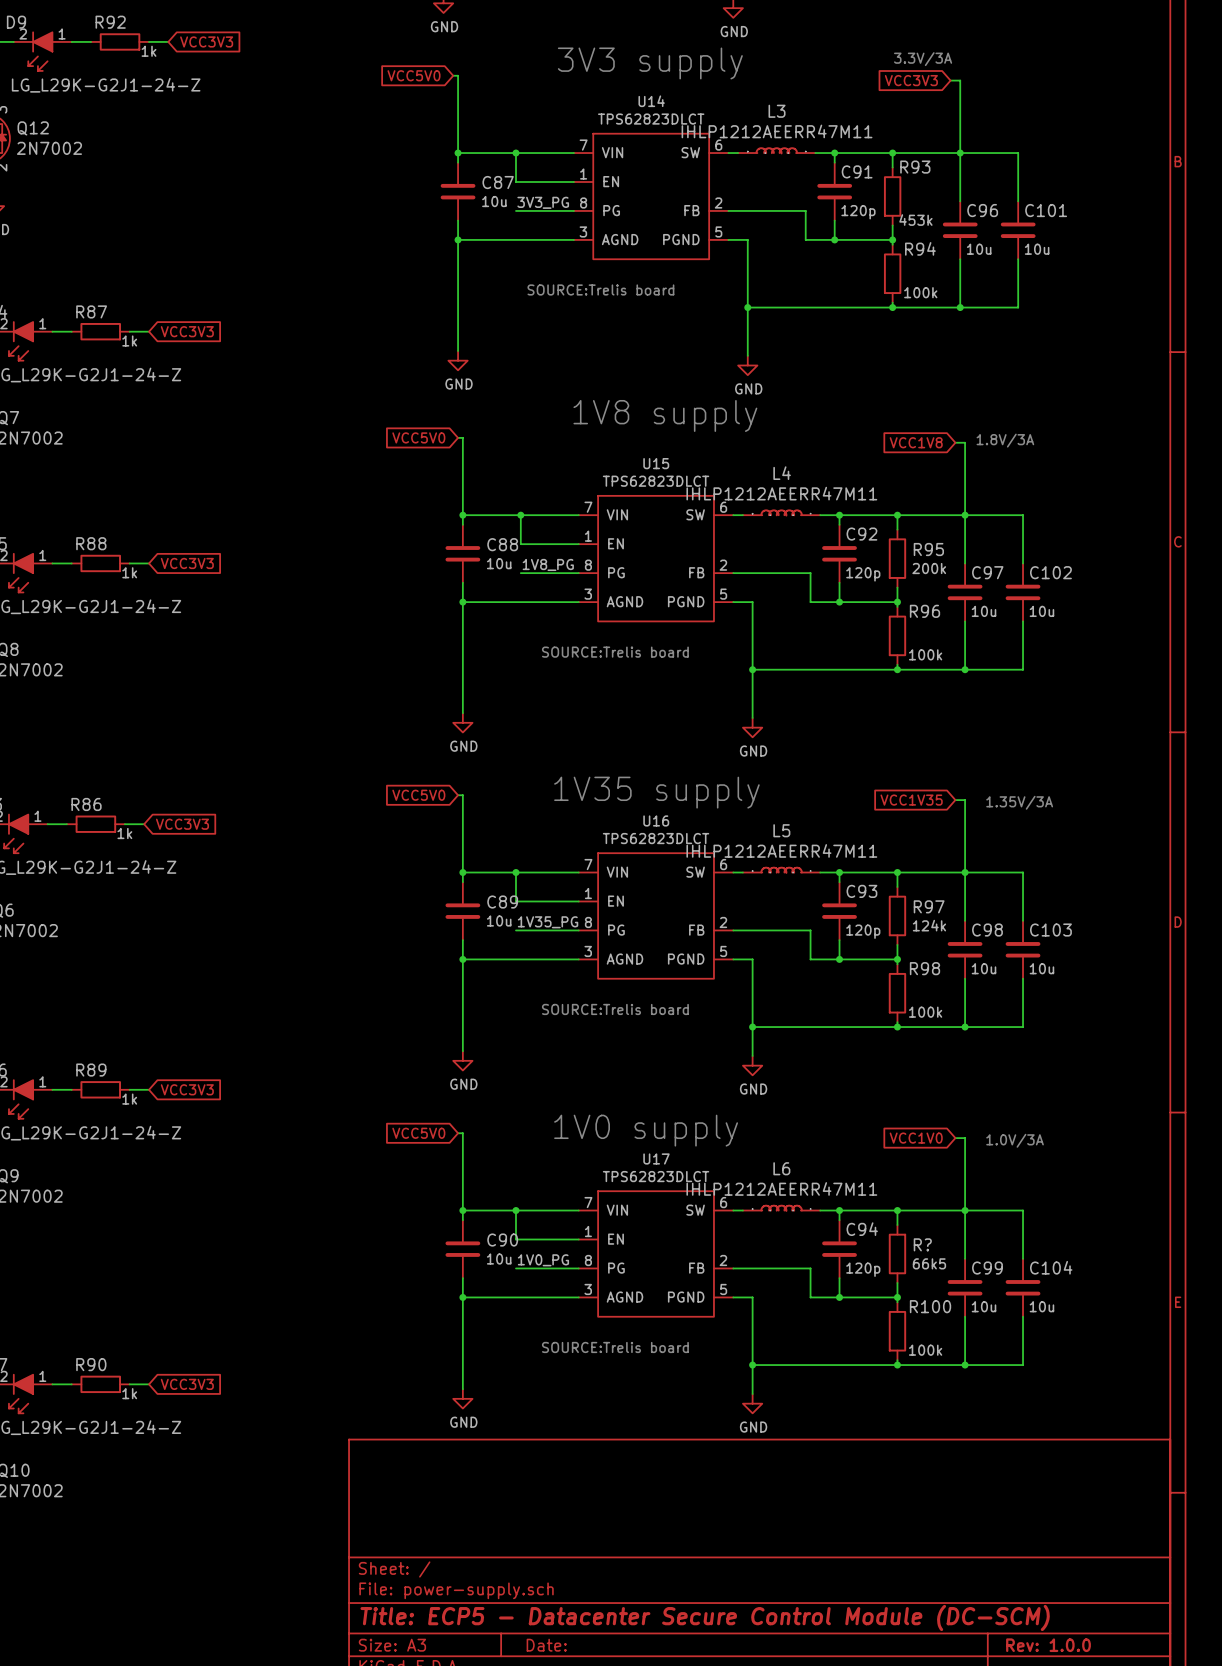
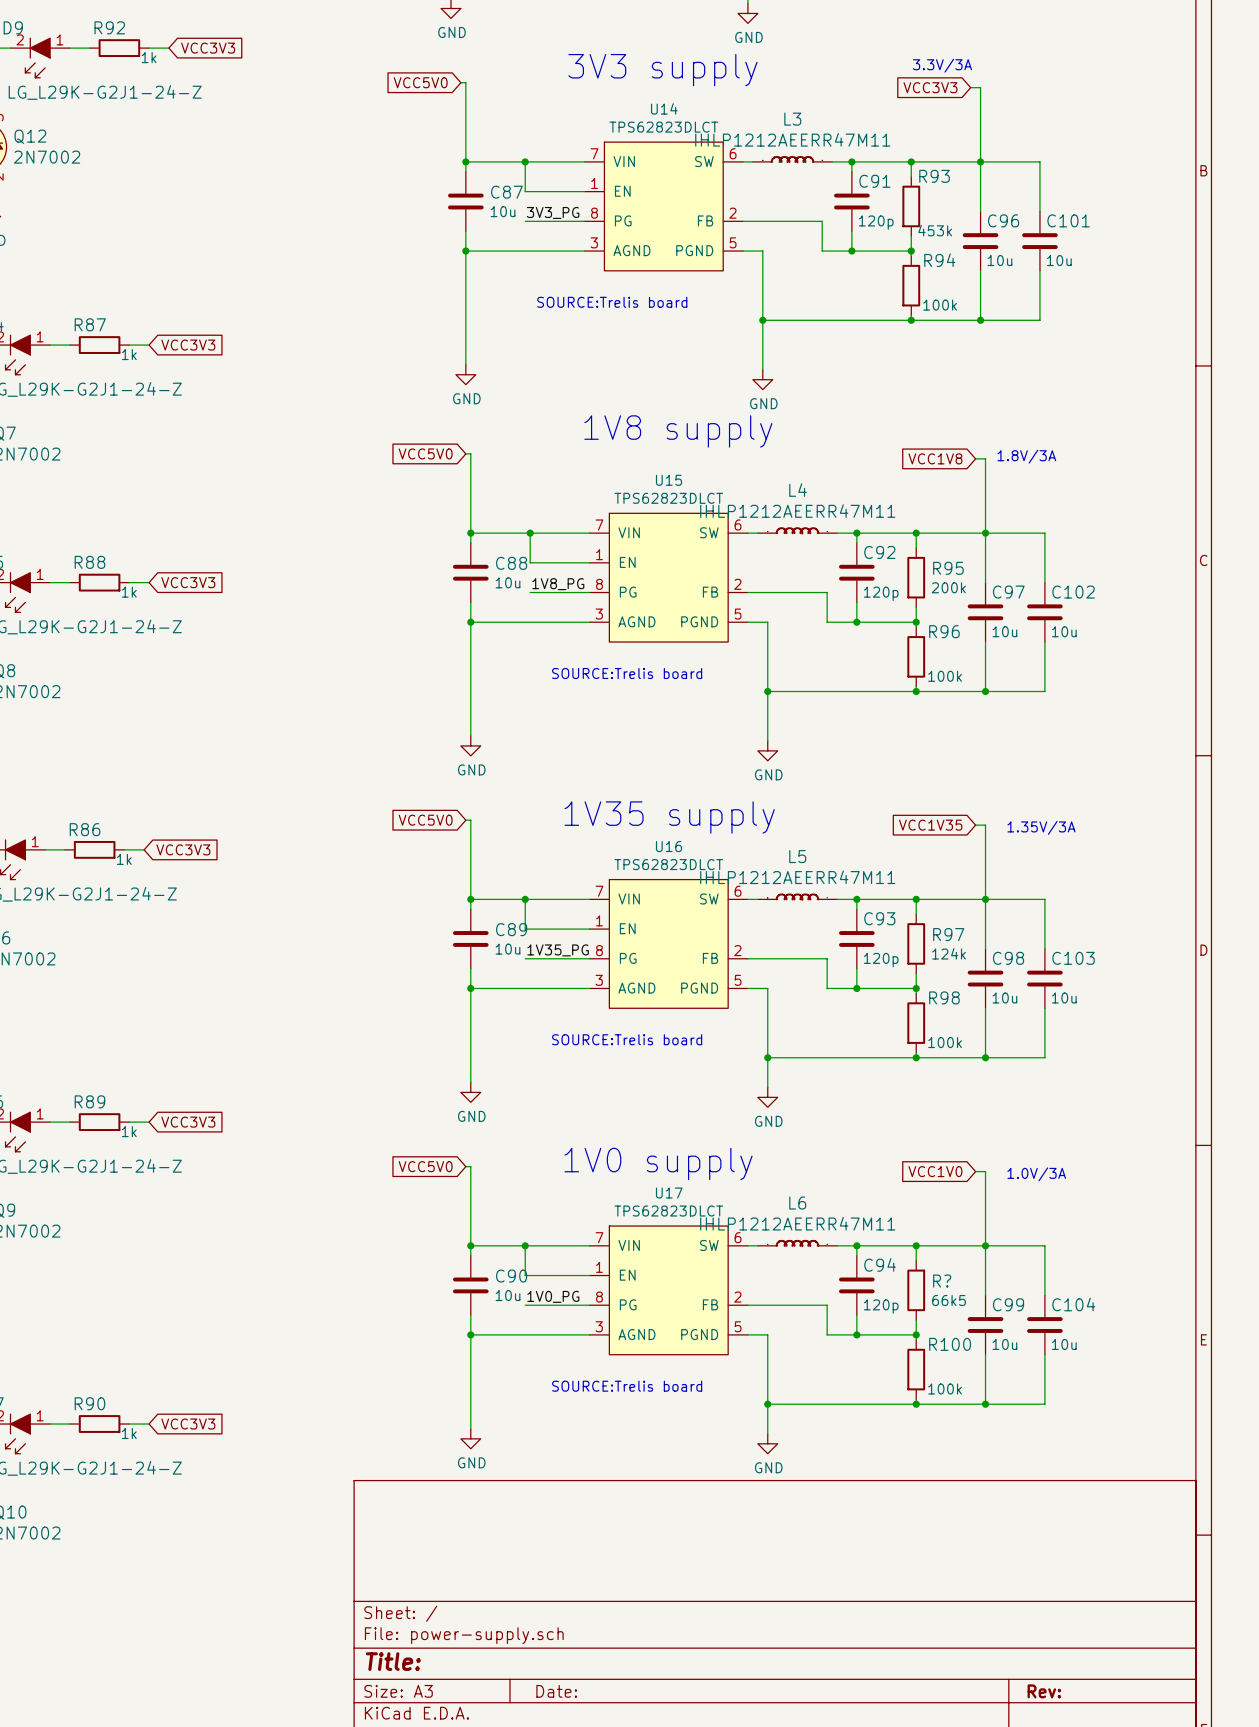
title block: Title: ECP5 - Datacenter Secure Control Module (DC-SCM) (705, 1617) -> Title: (393, 1661)
title block: Rev: 1.0.0 (1048, 1645) -> Rev: (1044, 1691)

